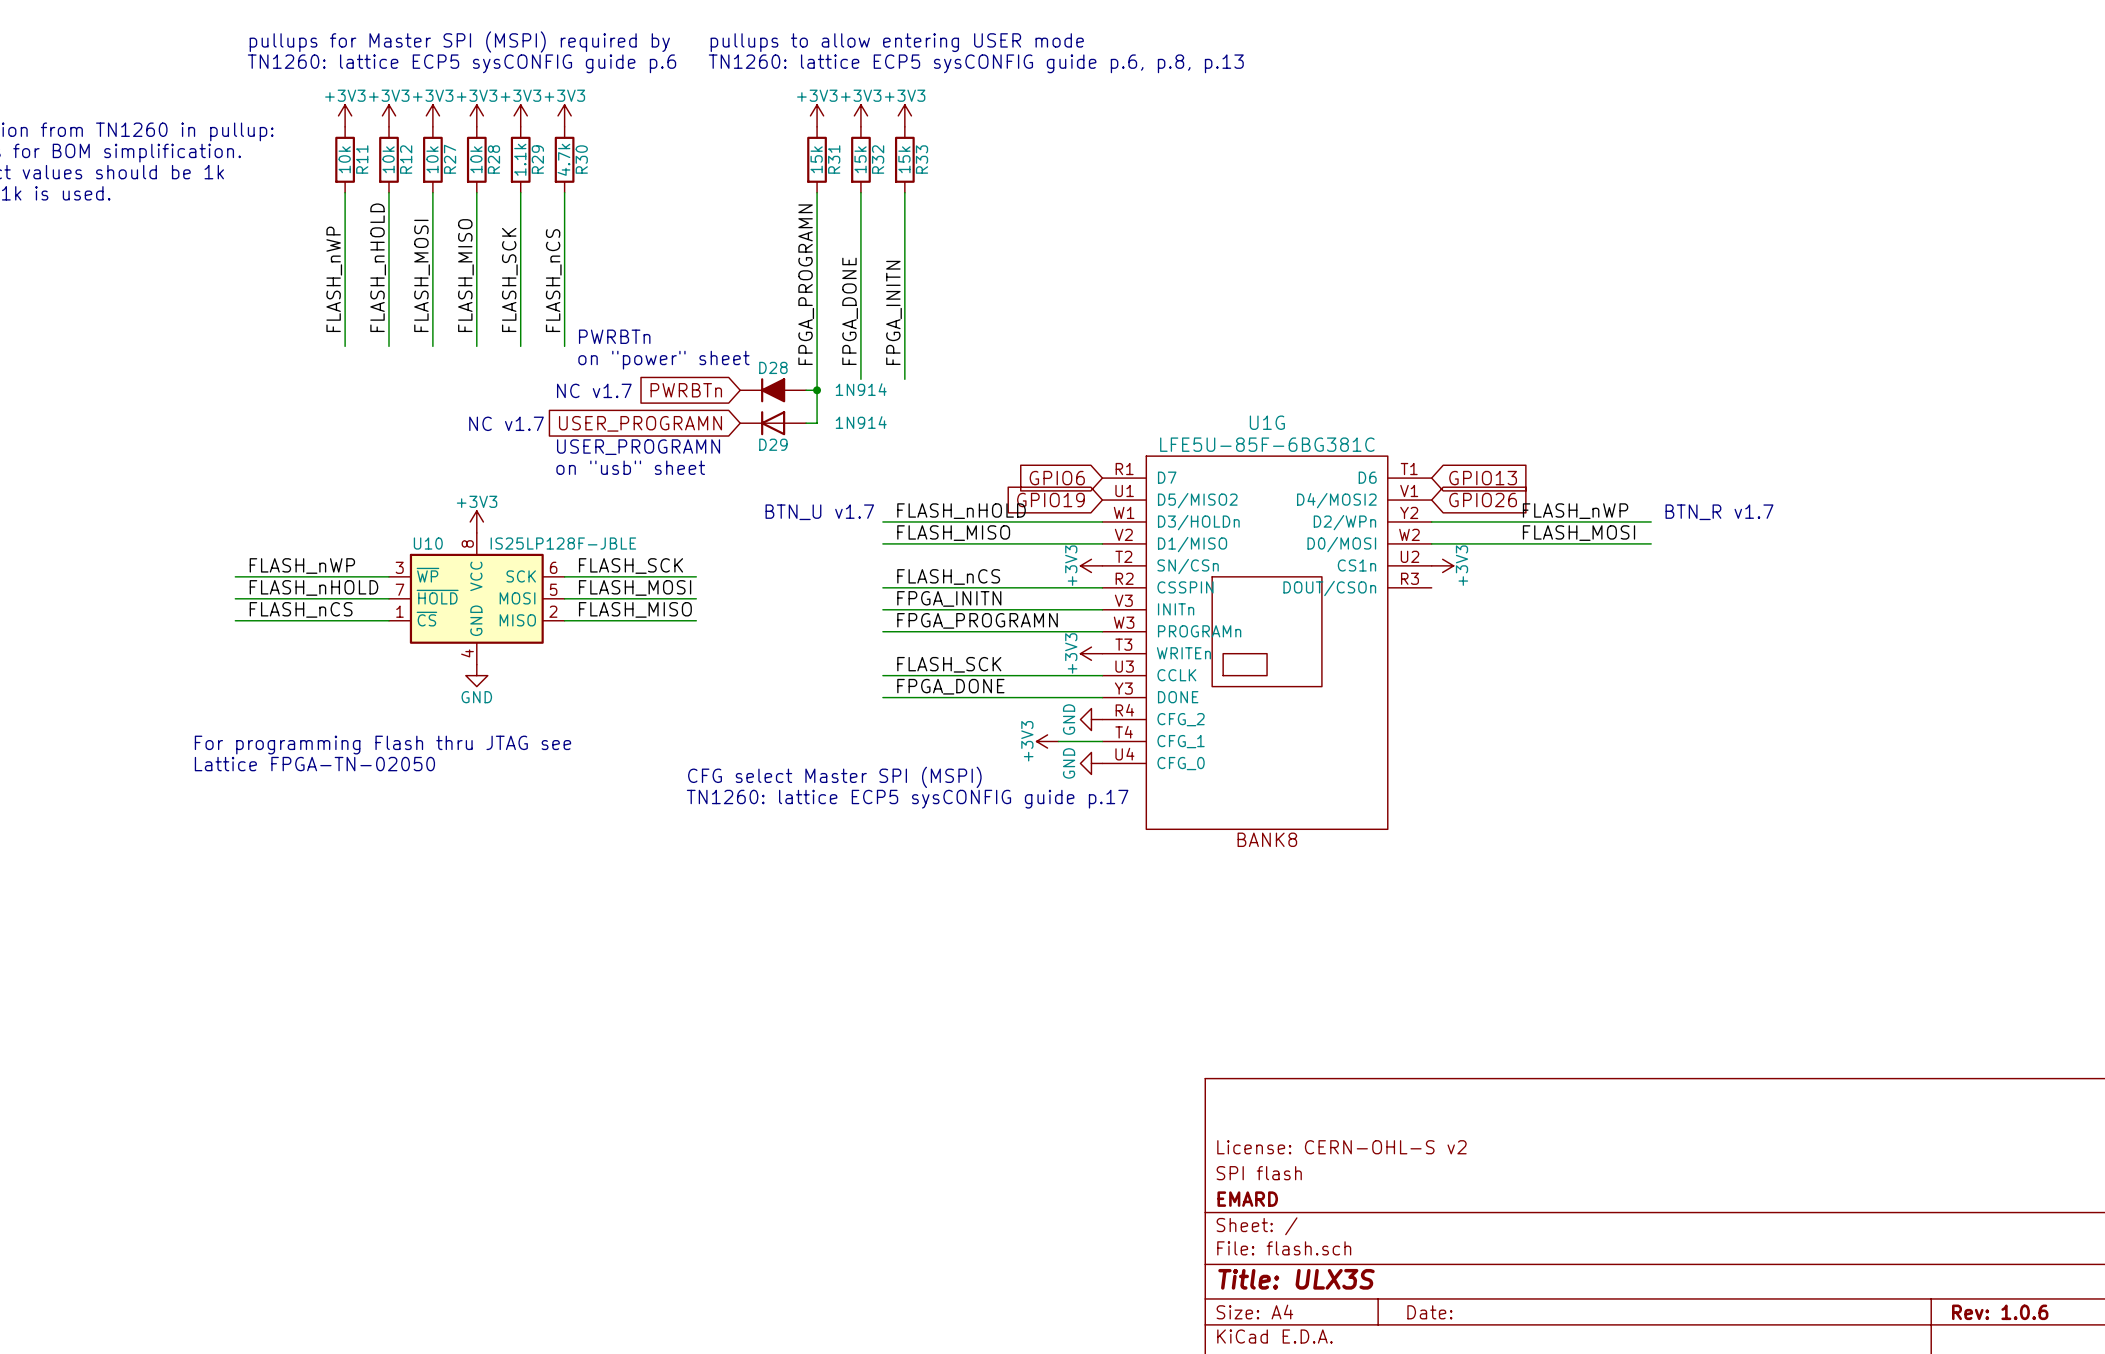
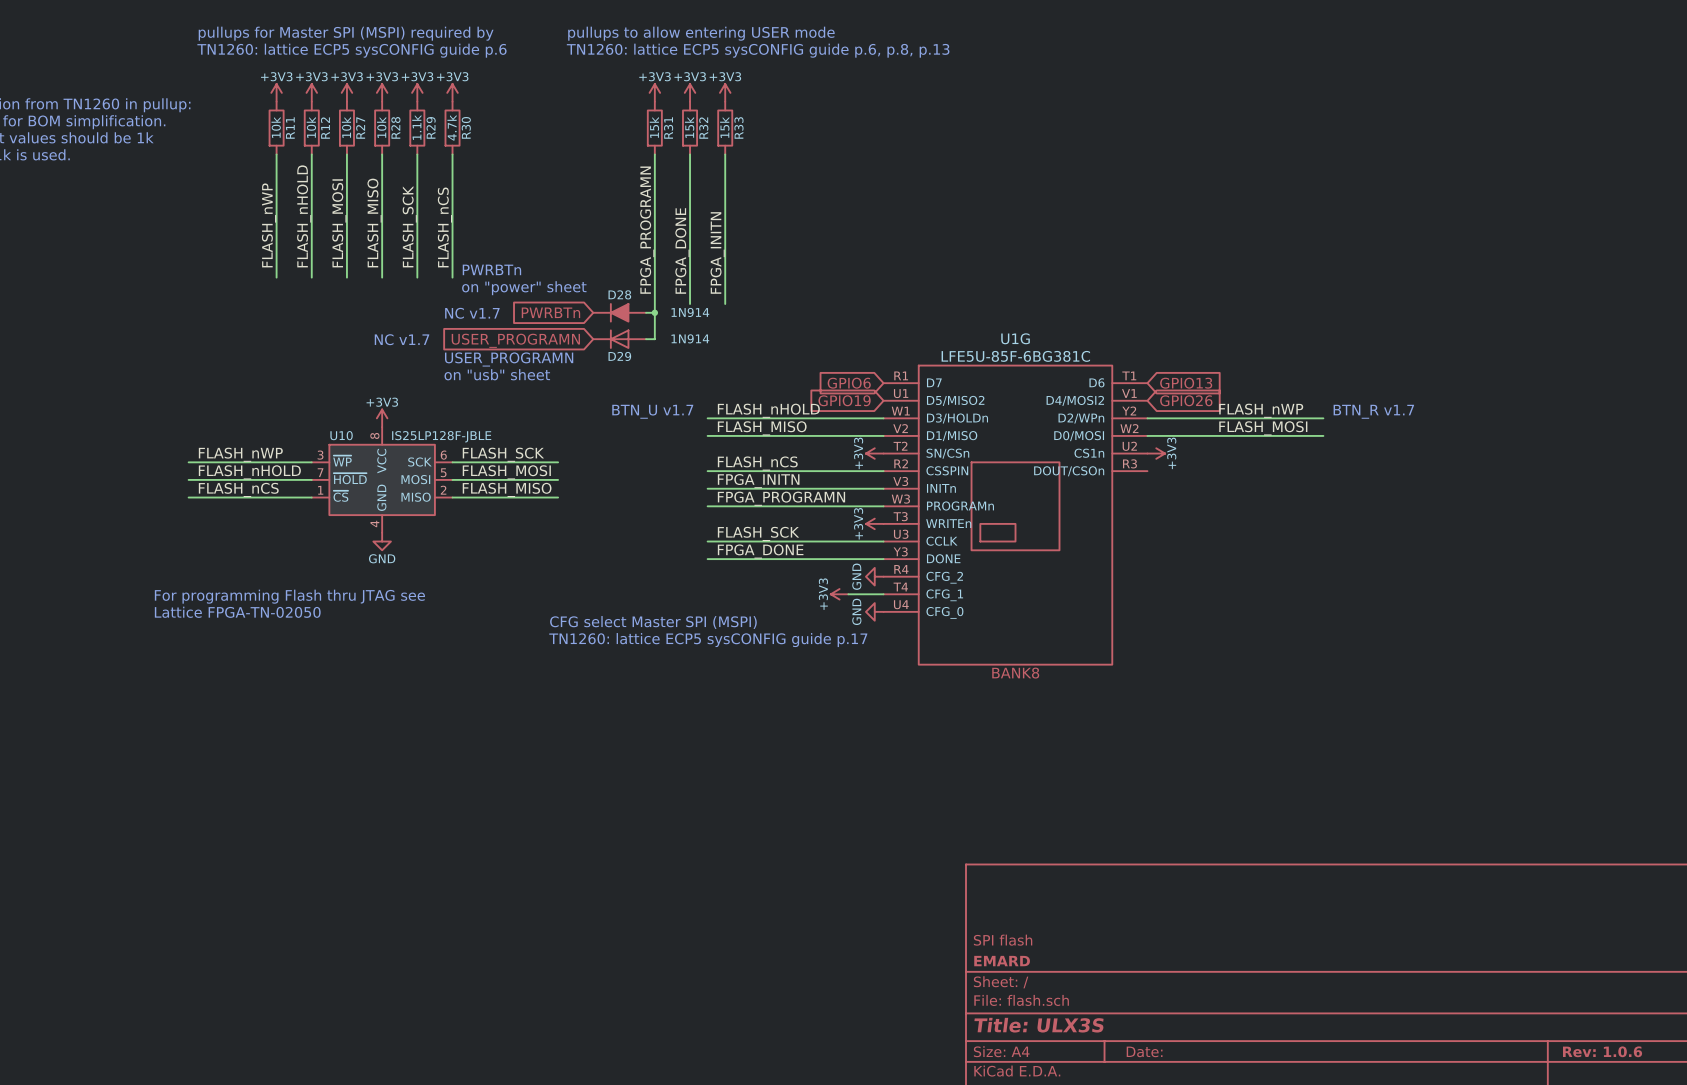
title block: License: CERN-OHL-S v2 (1341, 1147) -> none

